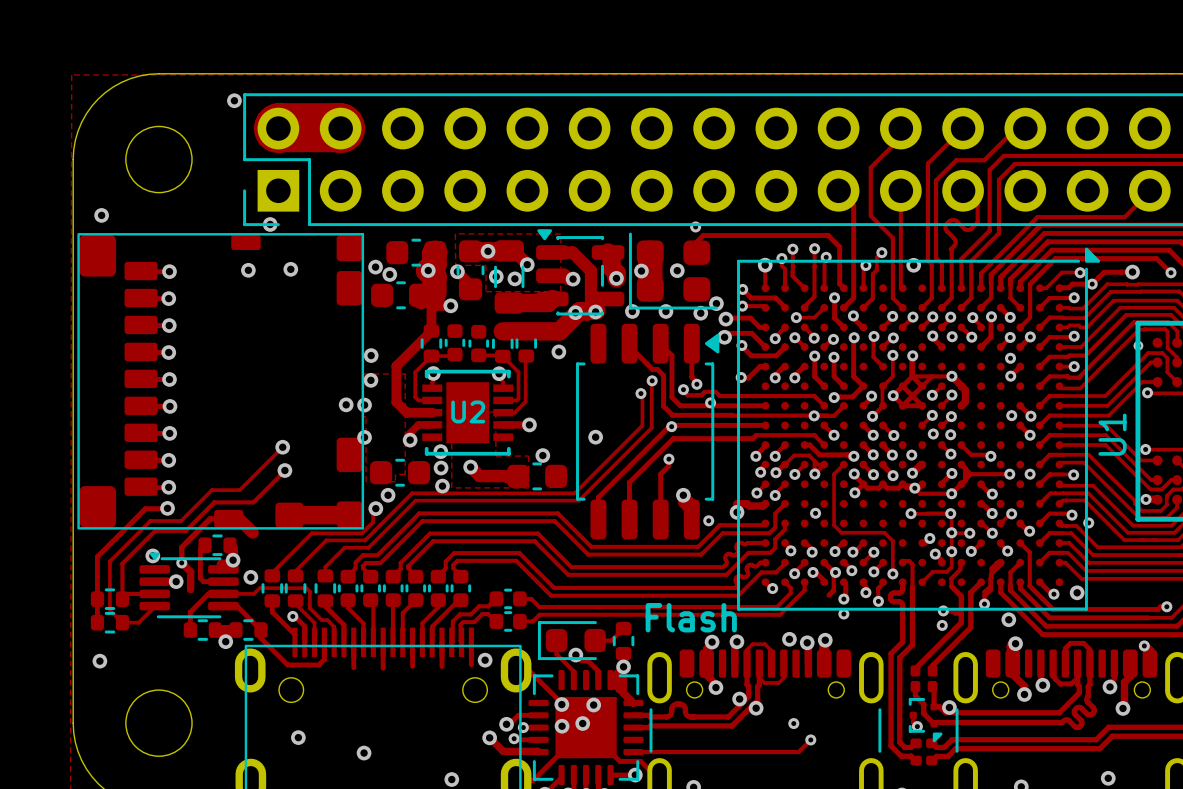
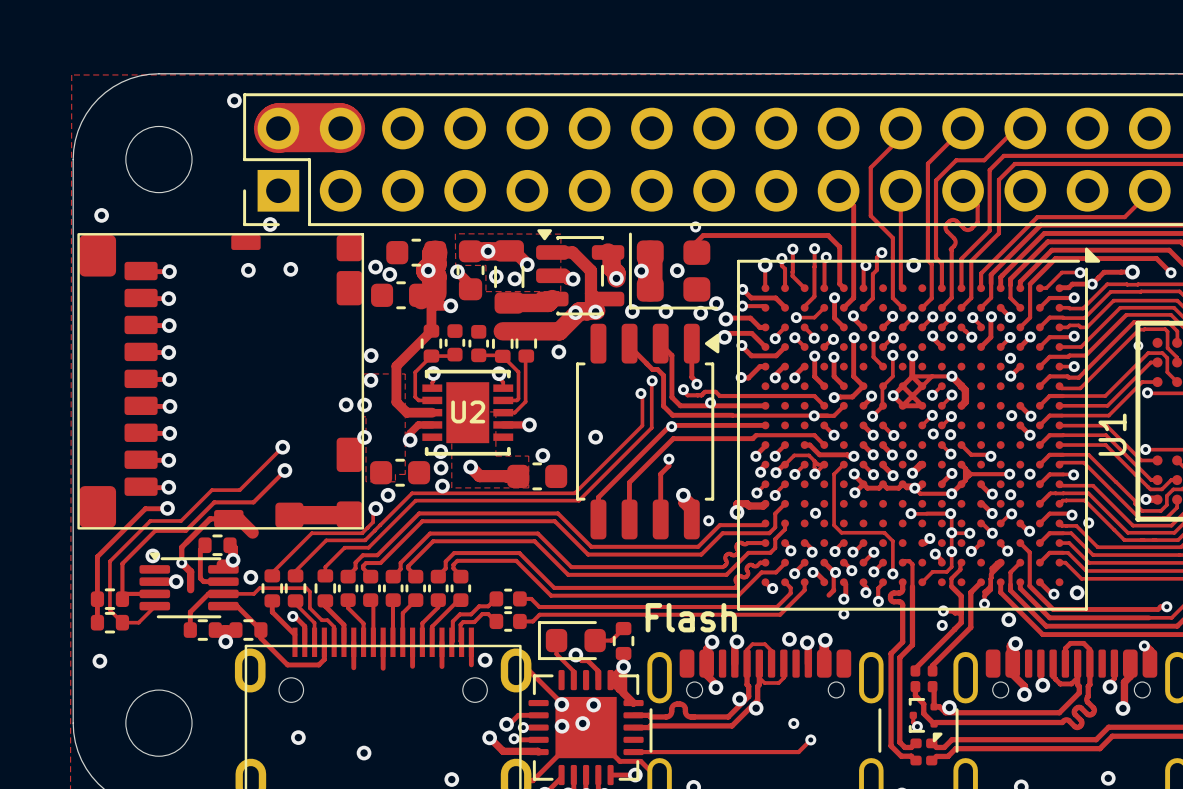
via: none -> (1010, 494)

